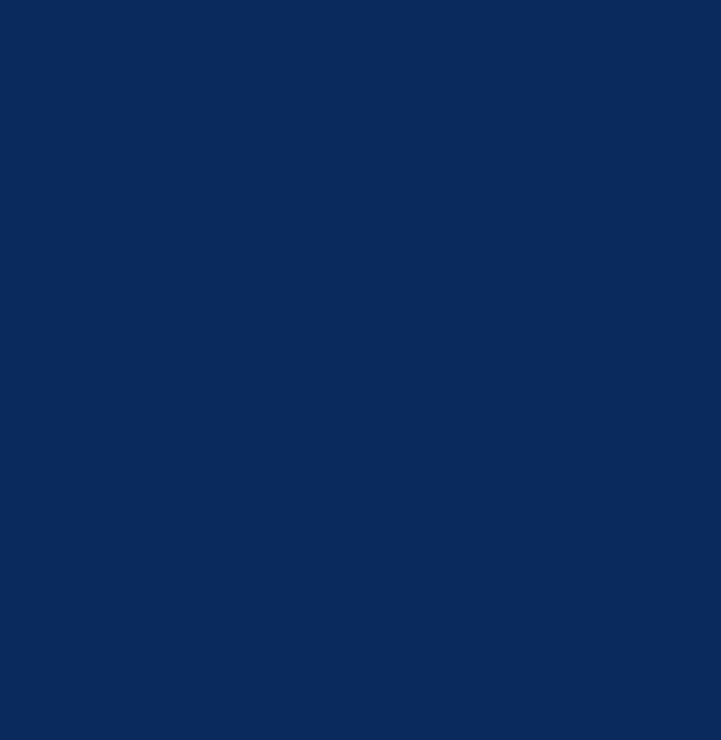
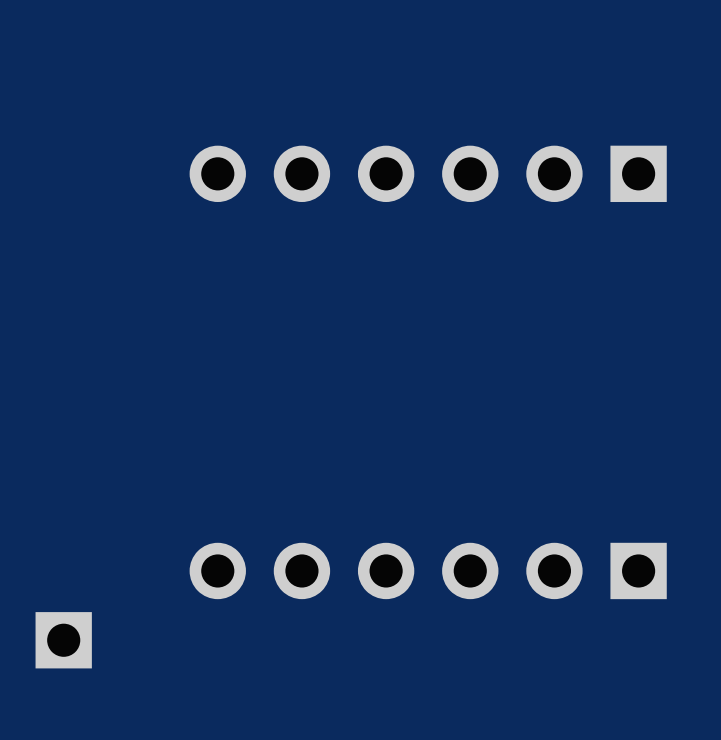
part: none -> (428, 173)
part: none -> (428, 570)
part: none -> (63, 640)

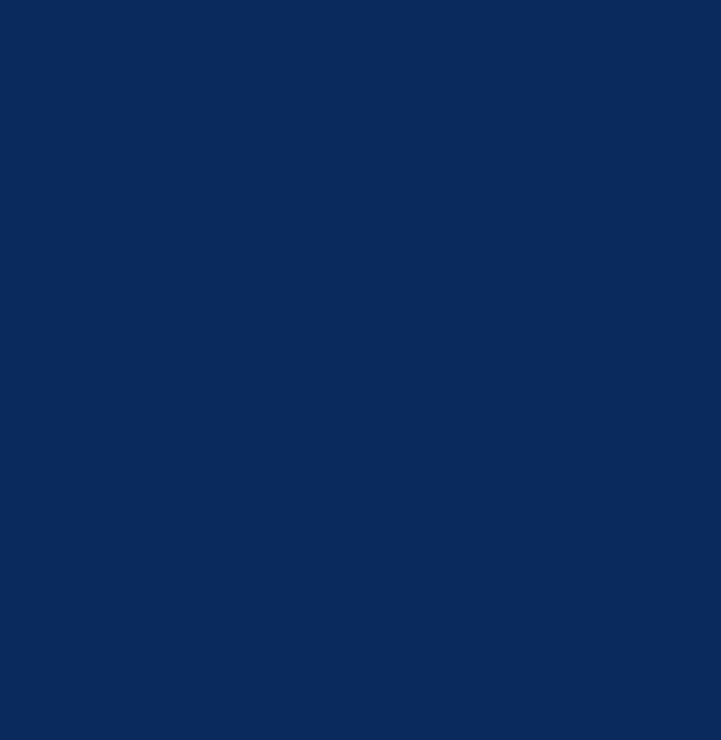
part: (428, 173) -> none
part: (428, 570) -> none
part: (63, 640) -> none

